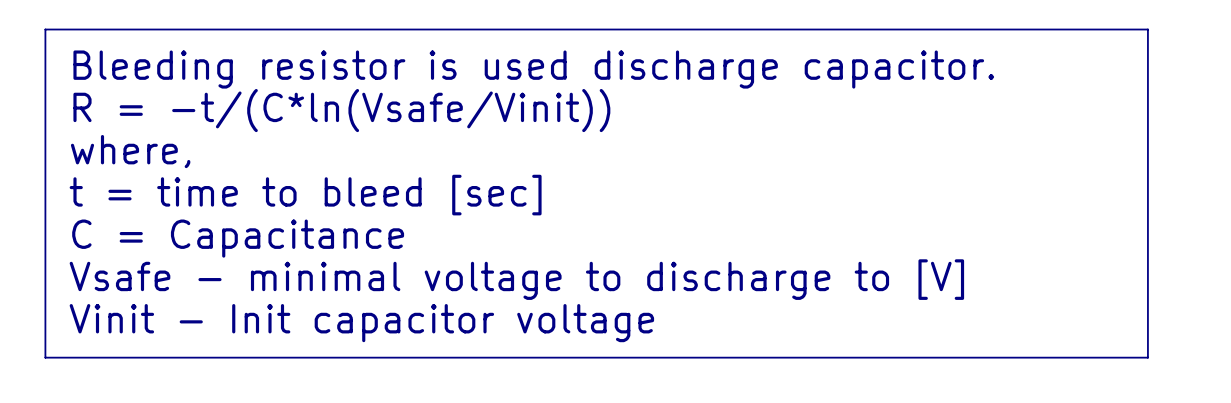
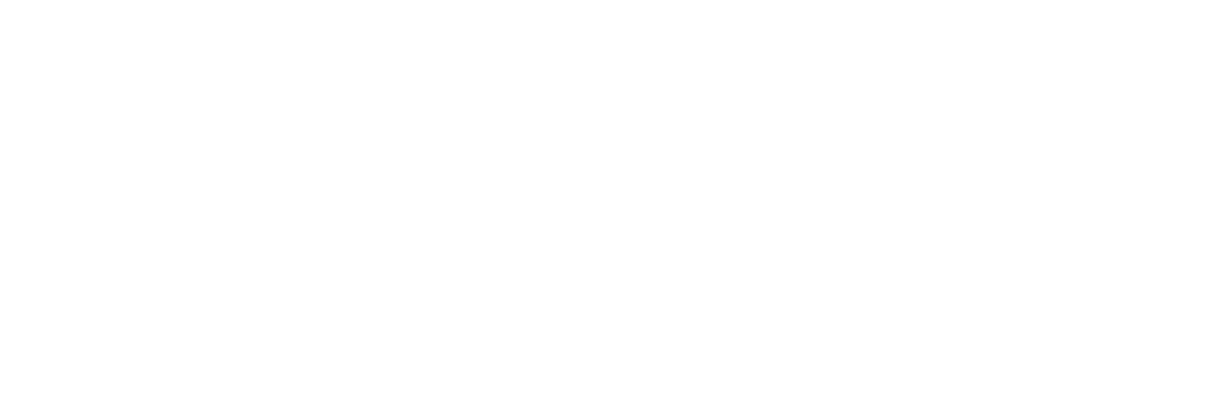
line: (45, 29) (1147, 29) (1147, 357) (45, 357) (45, 29) -> none
text: Bleeding resistor is used discharge capacitor. (533, 69) -> none
text: R = -t/(C*ln(Vsafe/Vinit)) (341, 110) -> none
text: where, (130, 151) -> none
text: t = time to bleed [sec] (305, 195) -> none
text: C = Capacitance (238, 238) -> none
text: Vsafe - minimal voltage to discharge to [V] (516, 279) -> none
text: Vinit - Init capacitor voltage (361, 323) -> none

